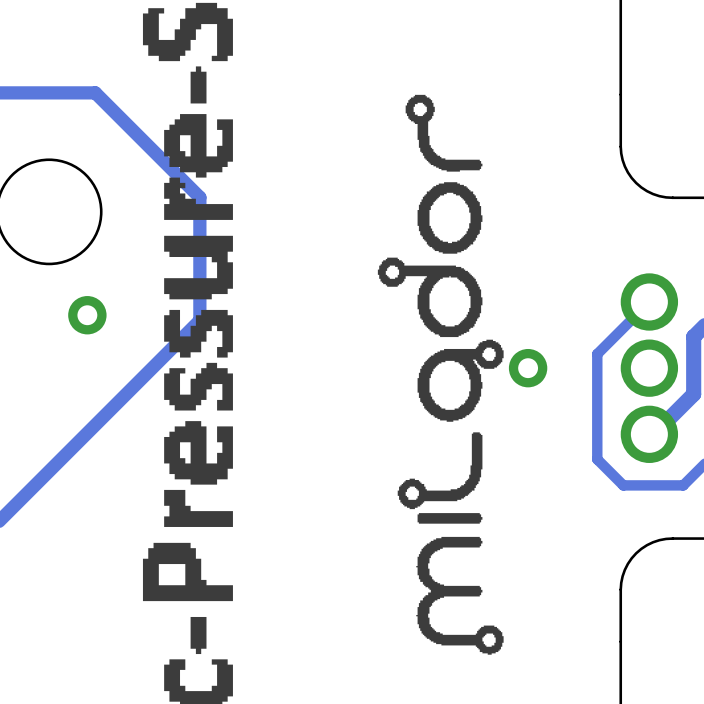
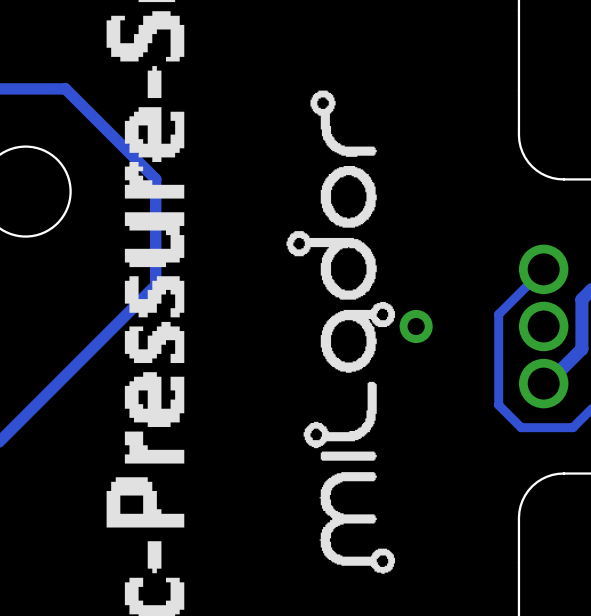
via: (87, 315) -> none
via position: (528, 368) -> (416, 326)
drawing position: (440, 374) -> (340, 332)

